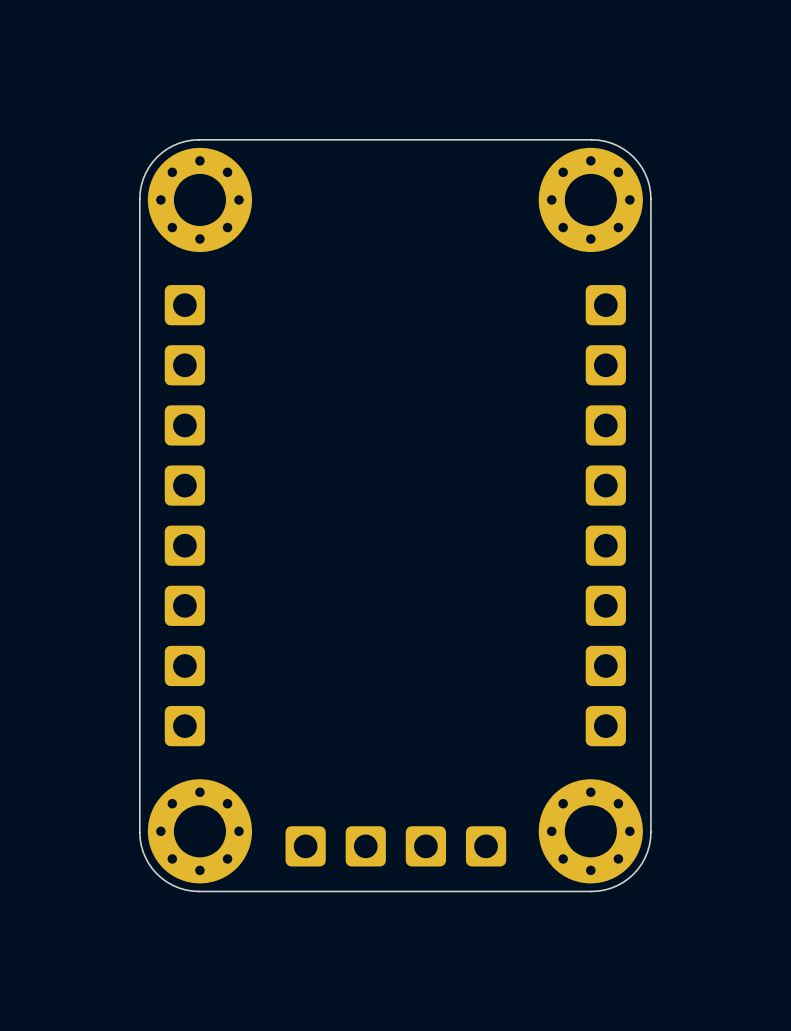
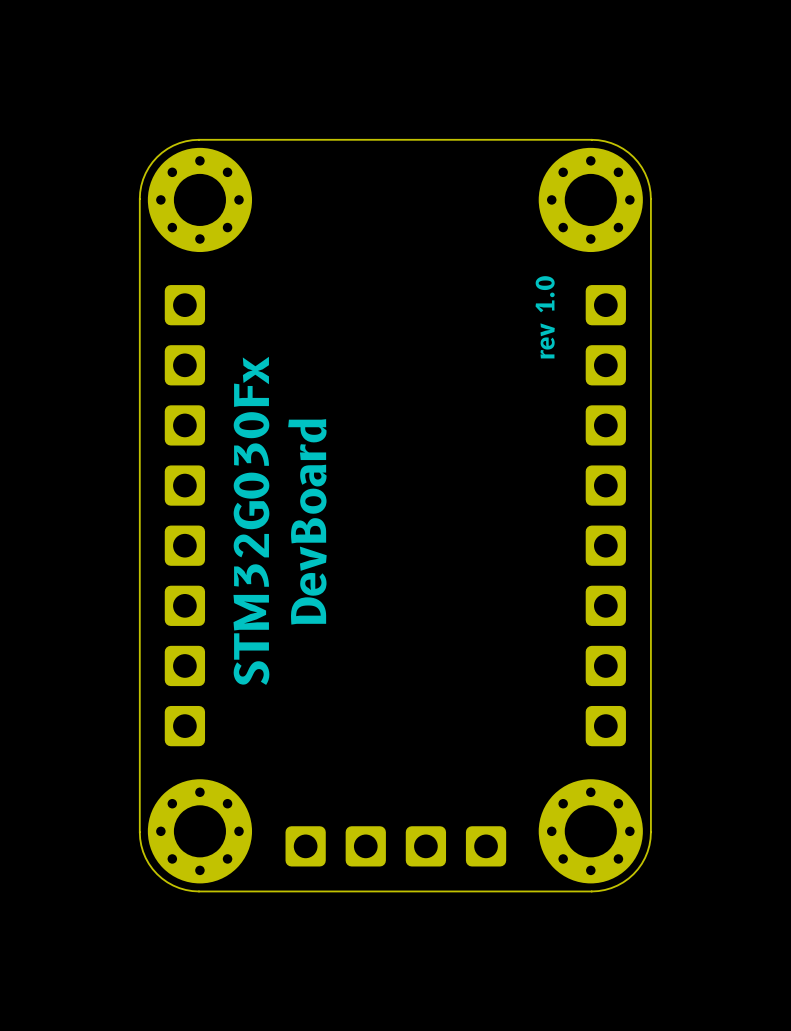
text: none -> rev 1.0 (545, 317)
text: none -> STM32G030Fx (251, 520)
text: none -> DevBoard (307, 521)

